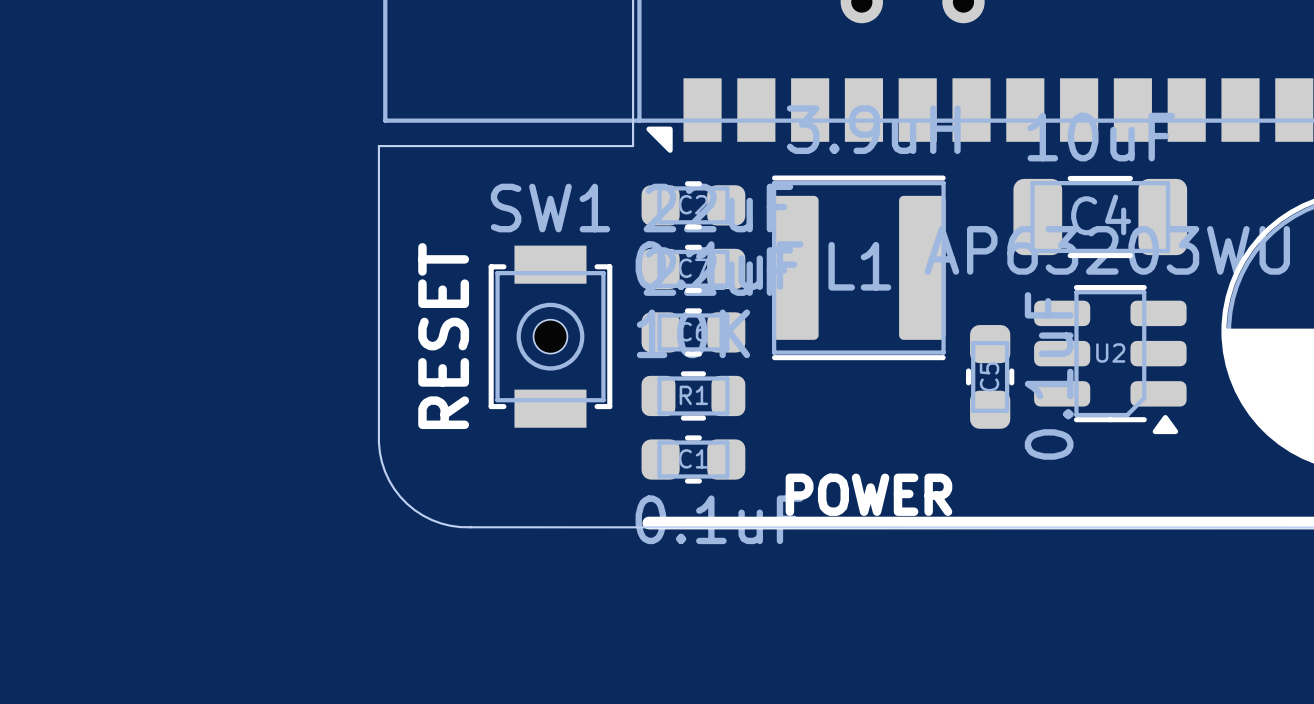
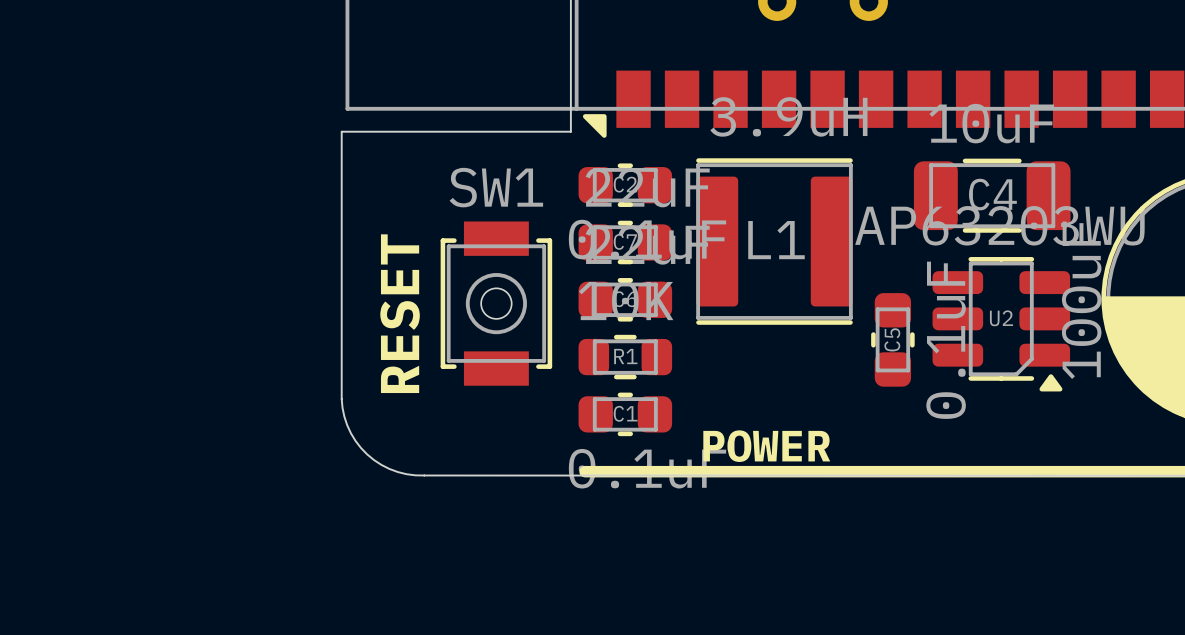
part value: none -> 100uF (1081, 300)

